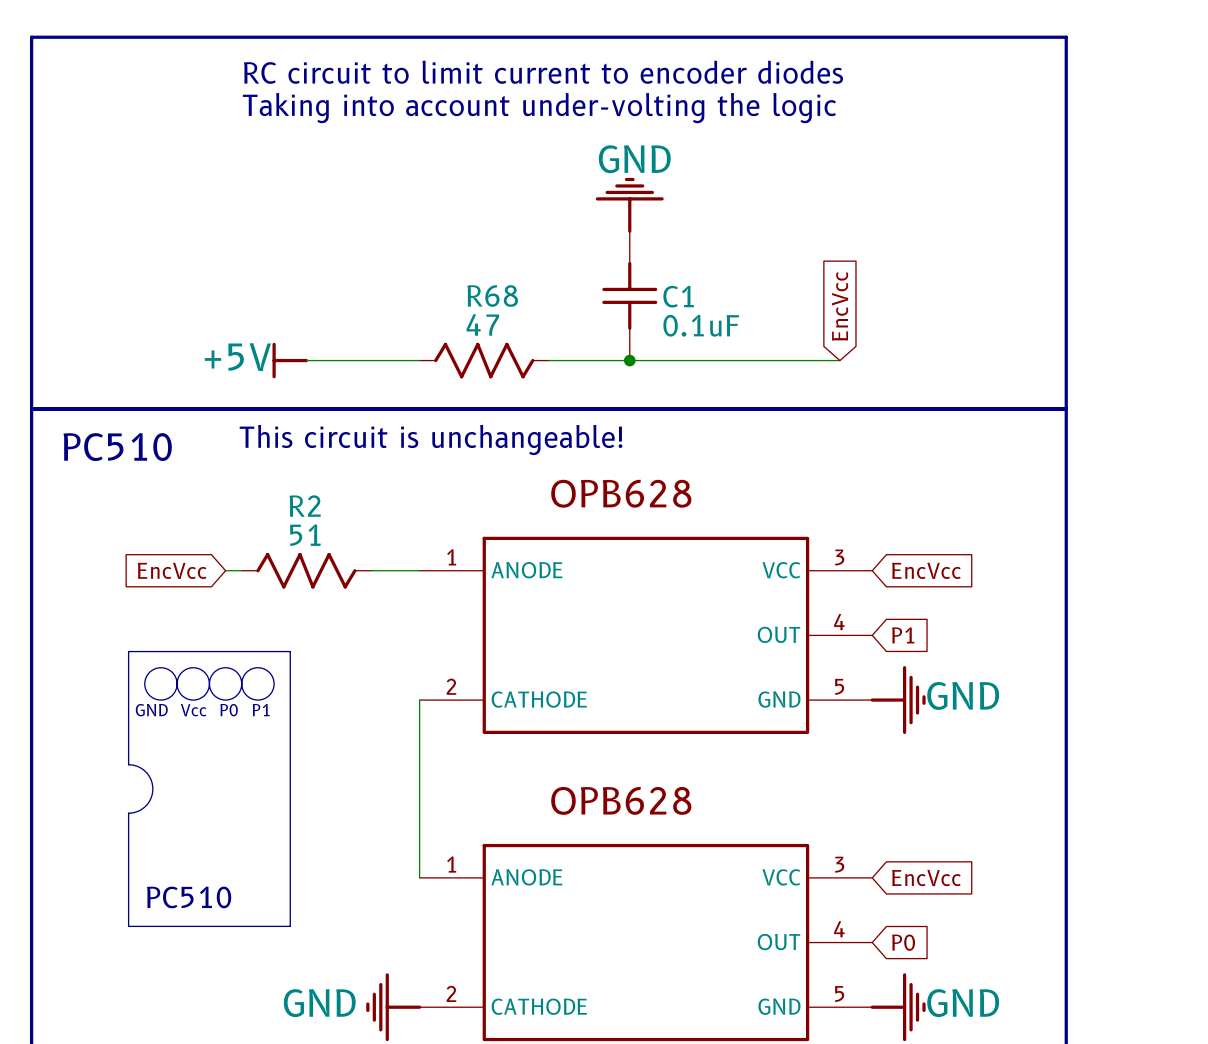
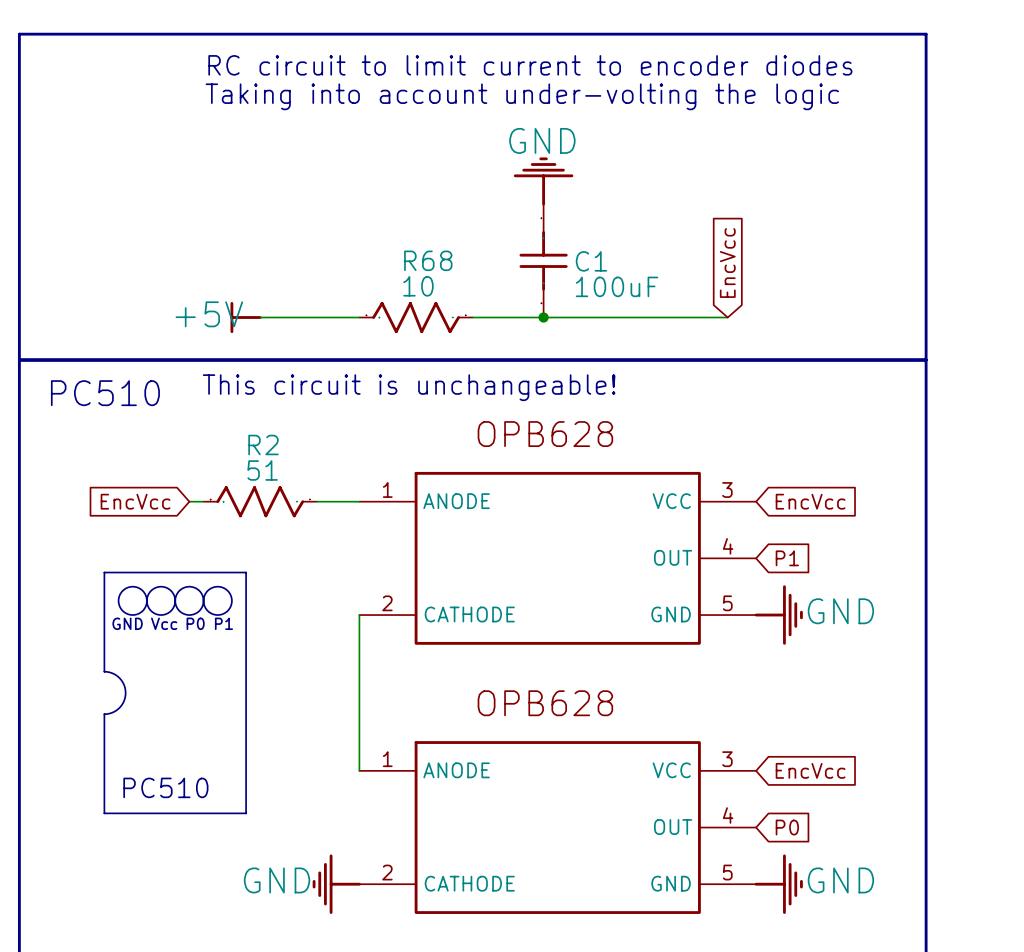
R68 value: 47 (482, 324) -> 10 (418, 286)
C1 value: 0.1uF (701, 325) -> 100uF (617, 286)

